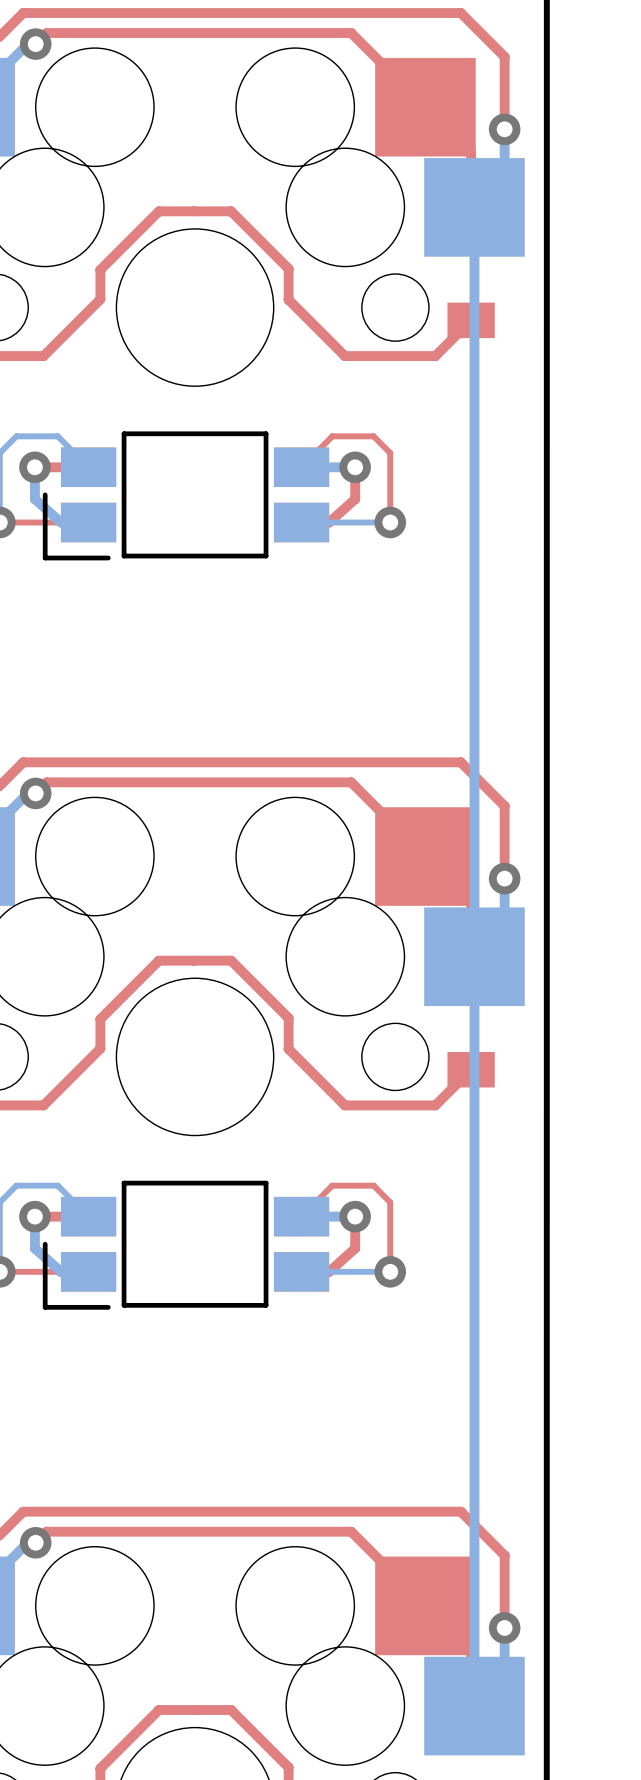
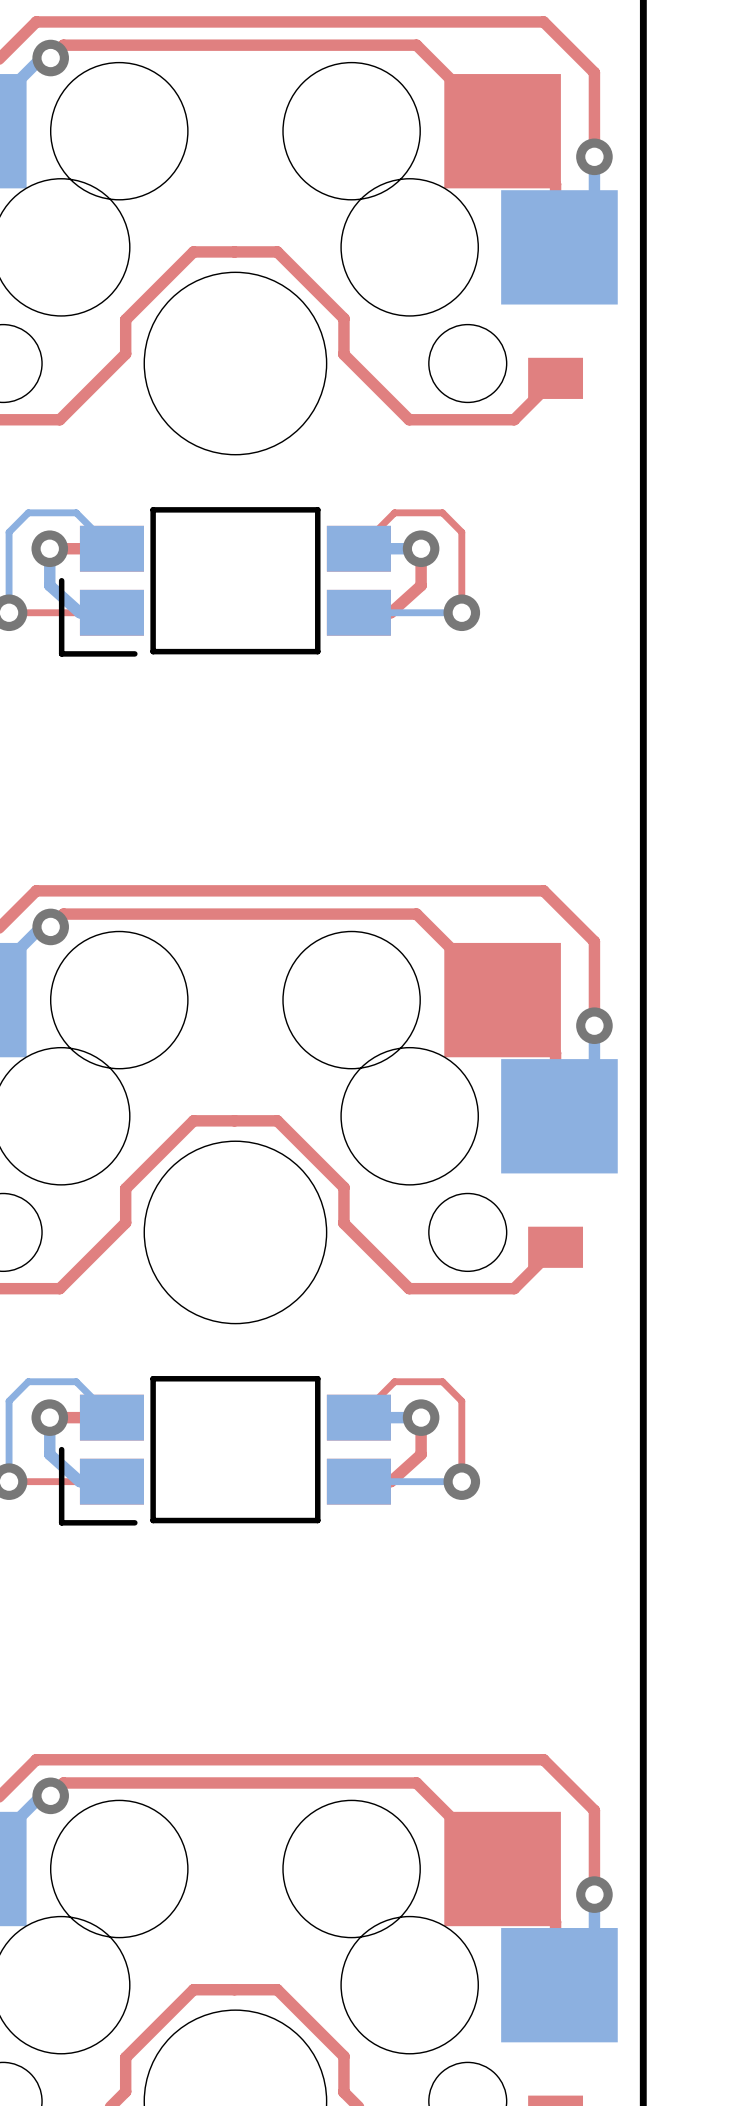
bottom track: (474, 207) (474, 1706) -> none

